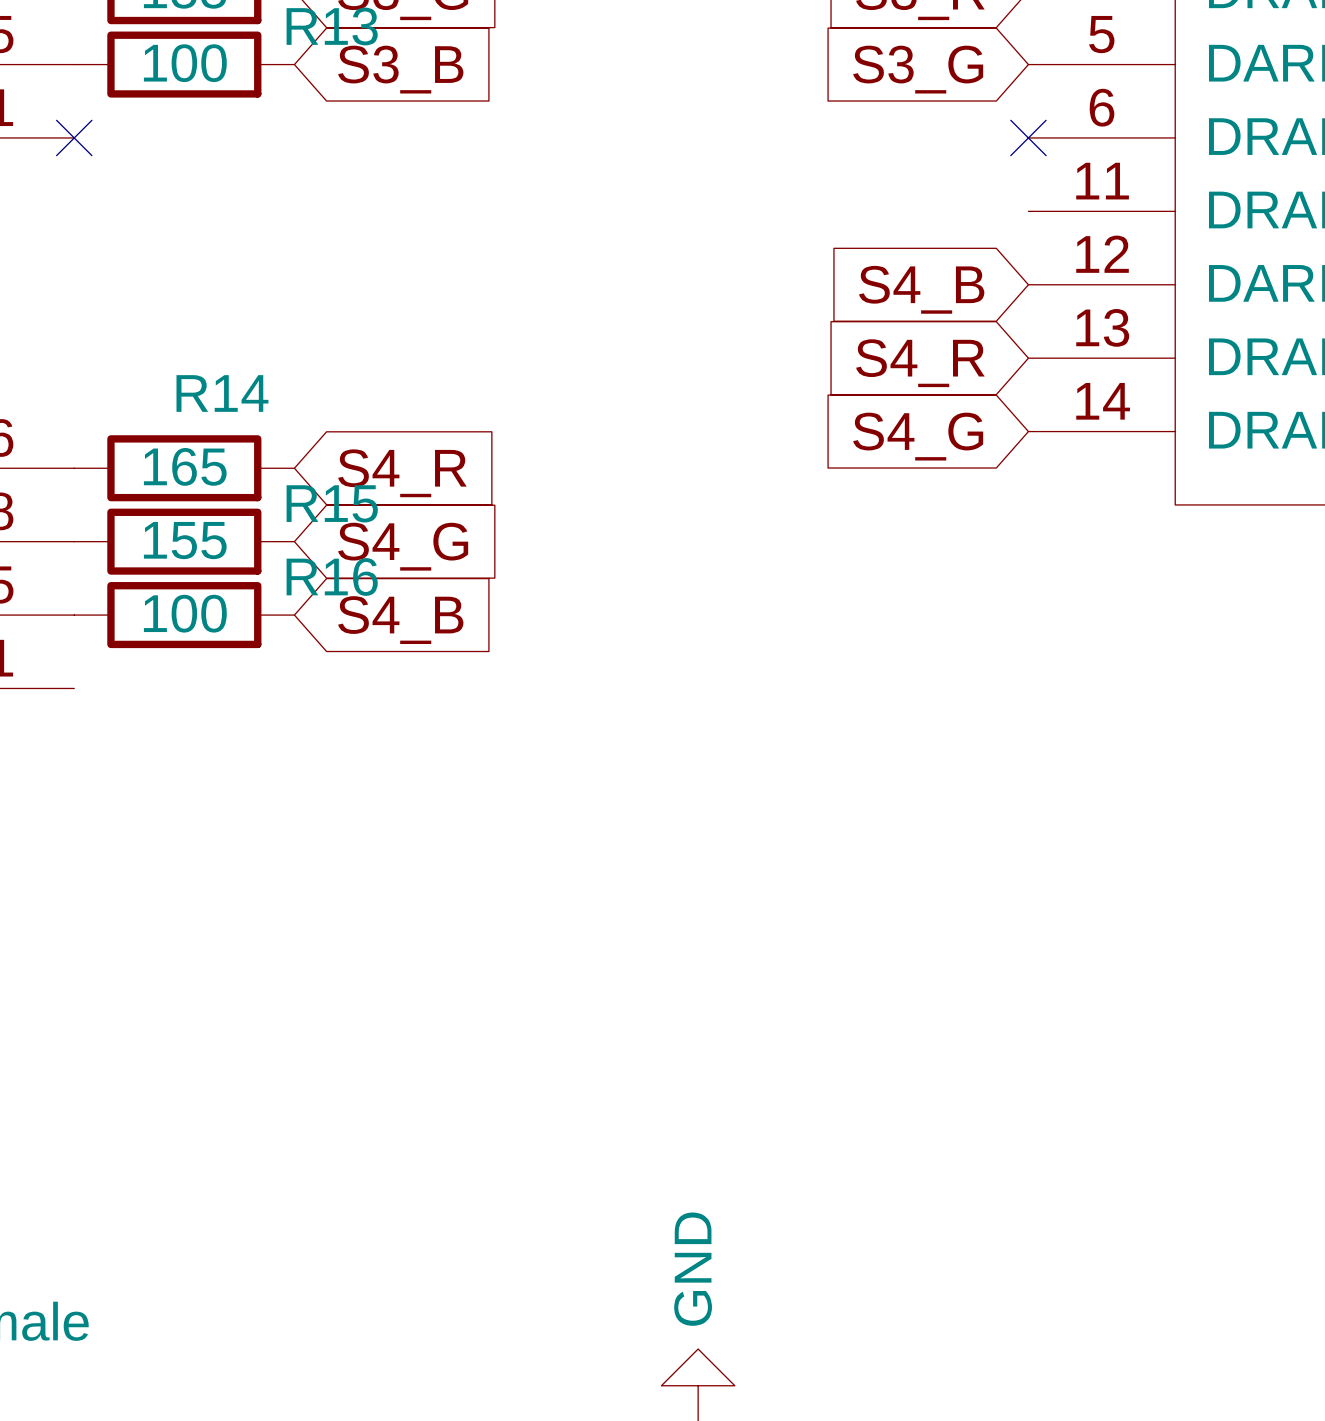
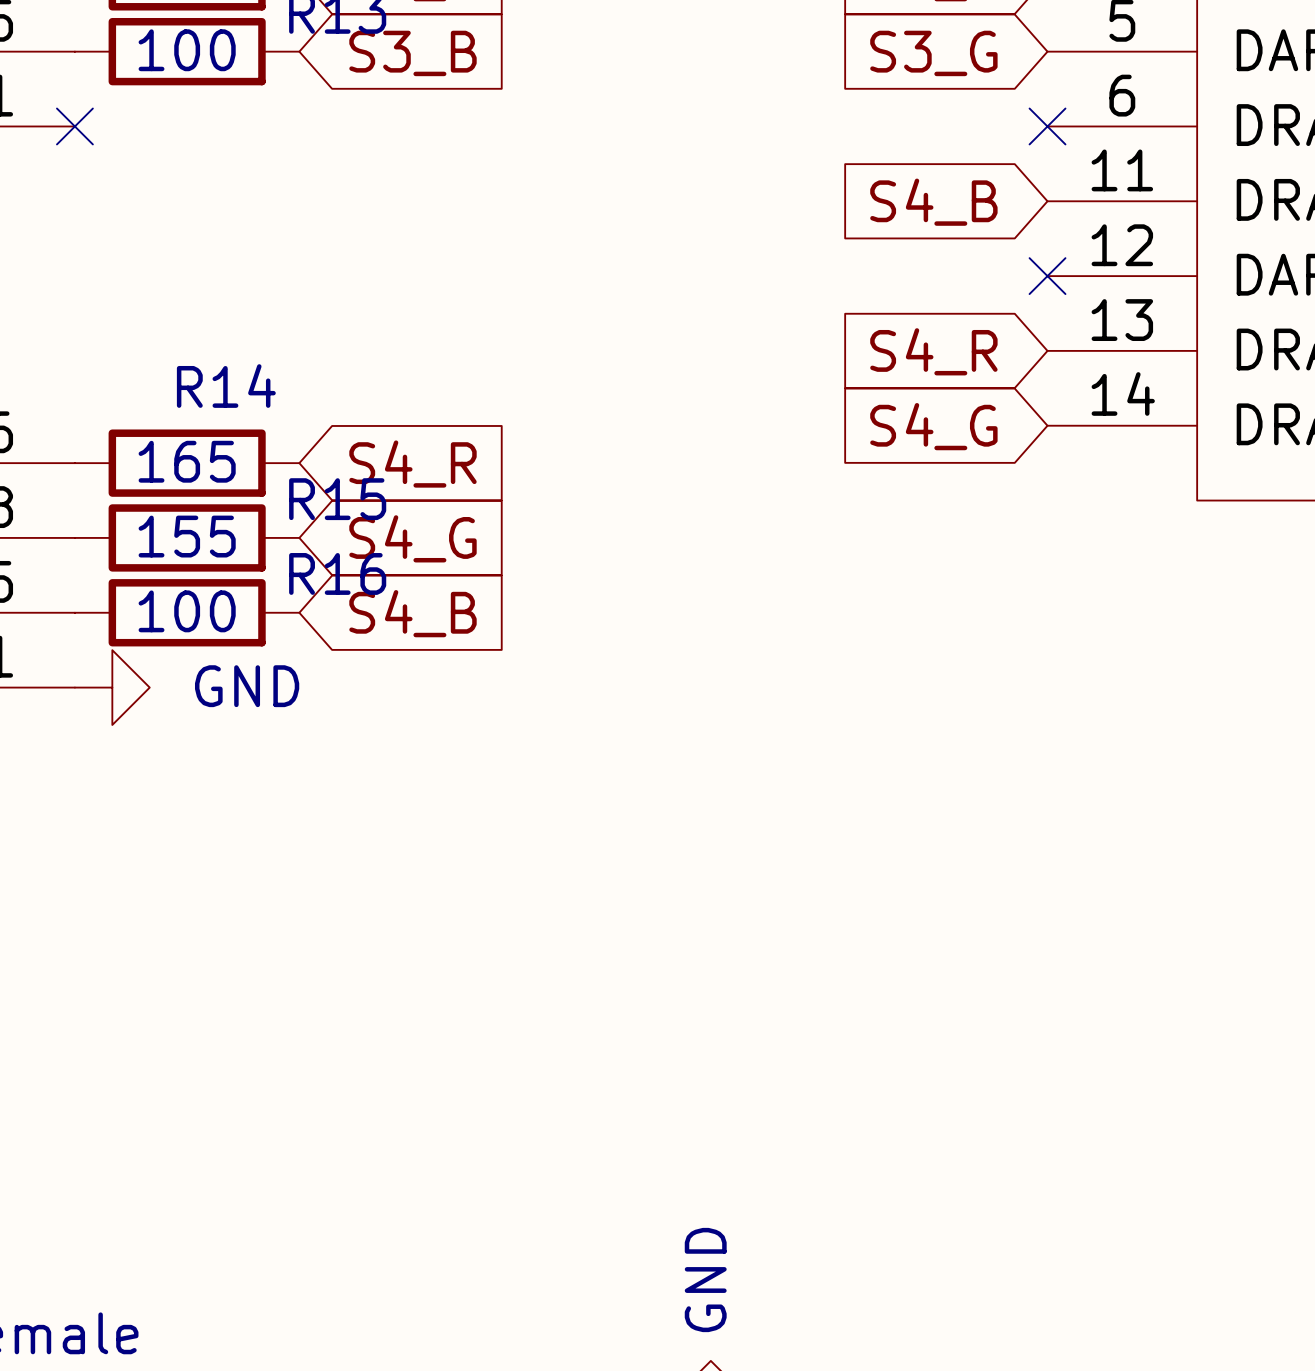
no-connect mark: none -> (1047, 276)
global label position: S4_B (921, 289) -> S4_B (933, 202)
power symbol: none -> GND (112, 687)

